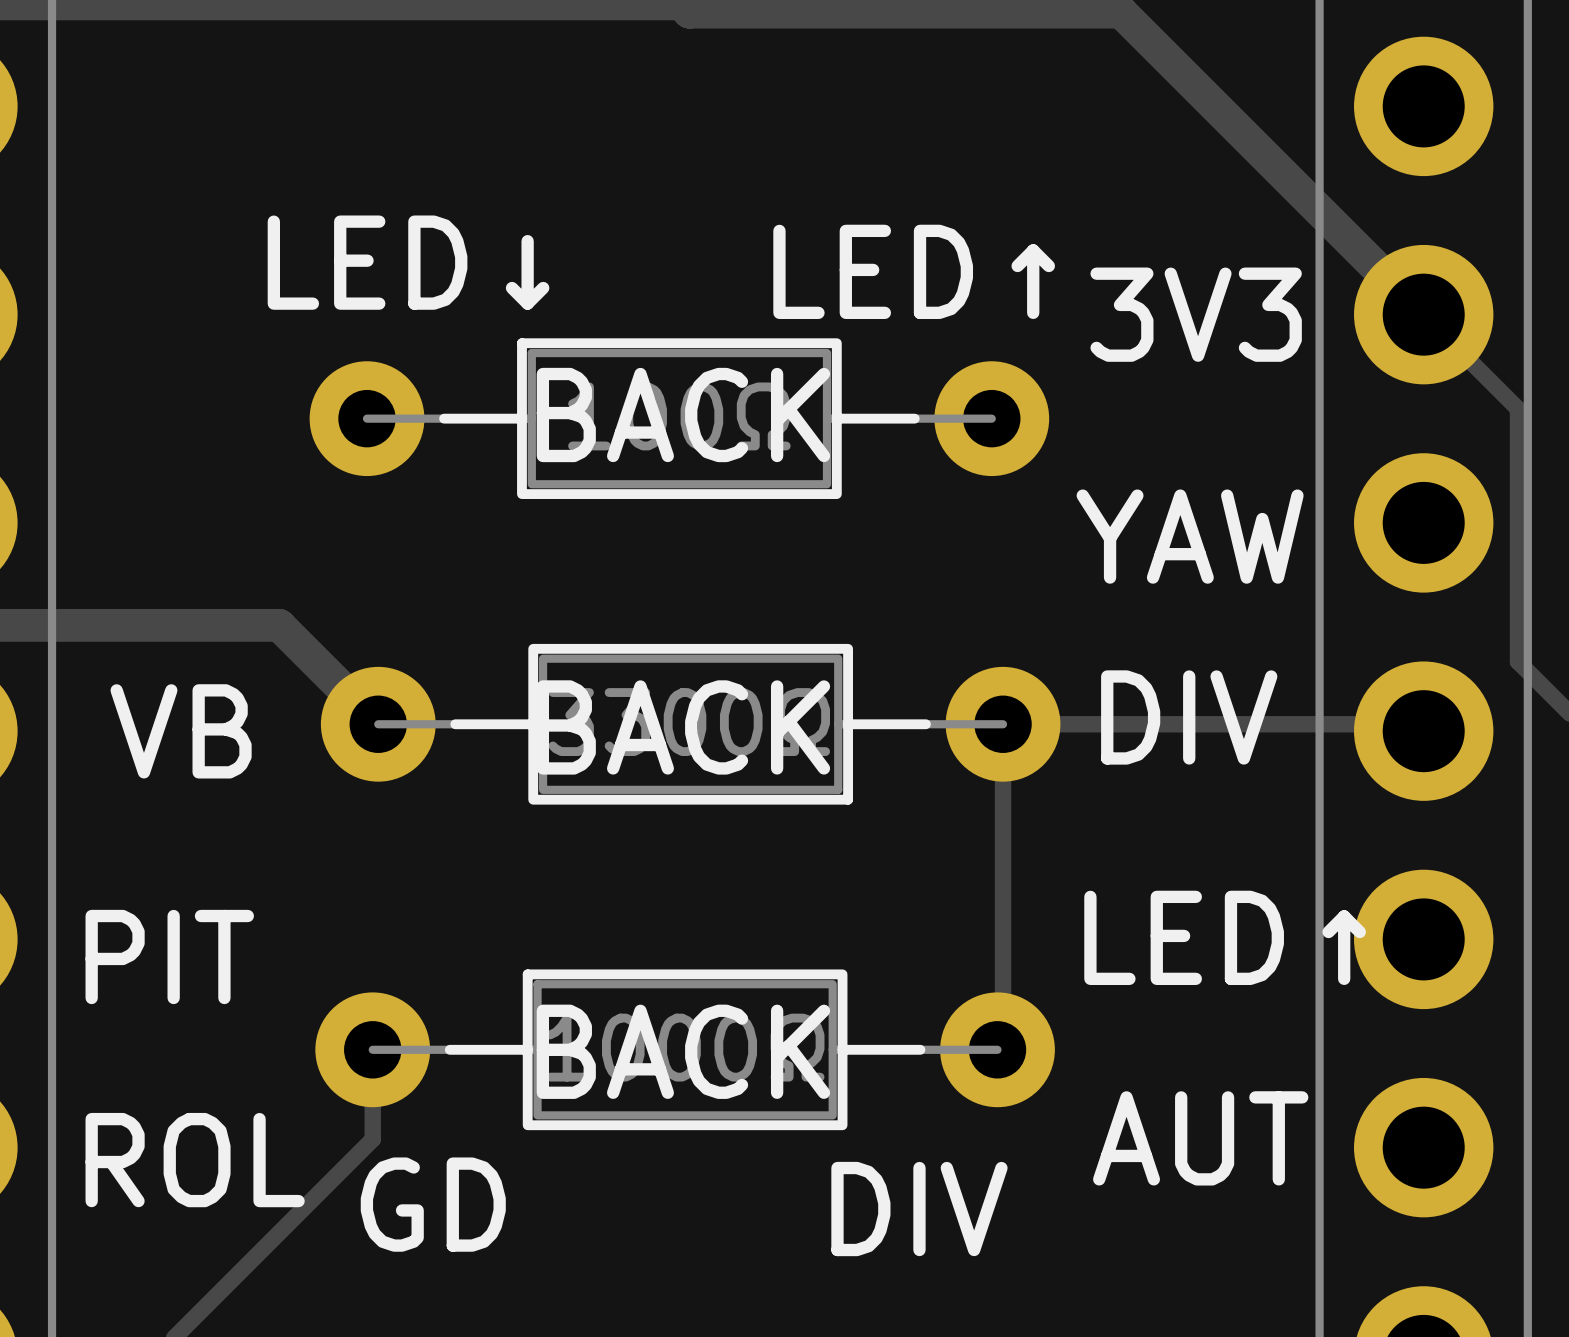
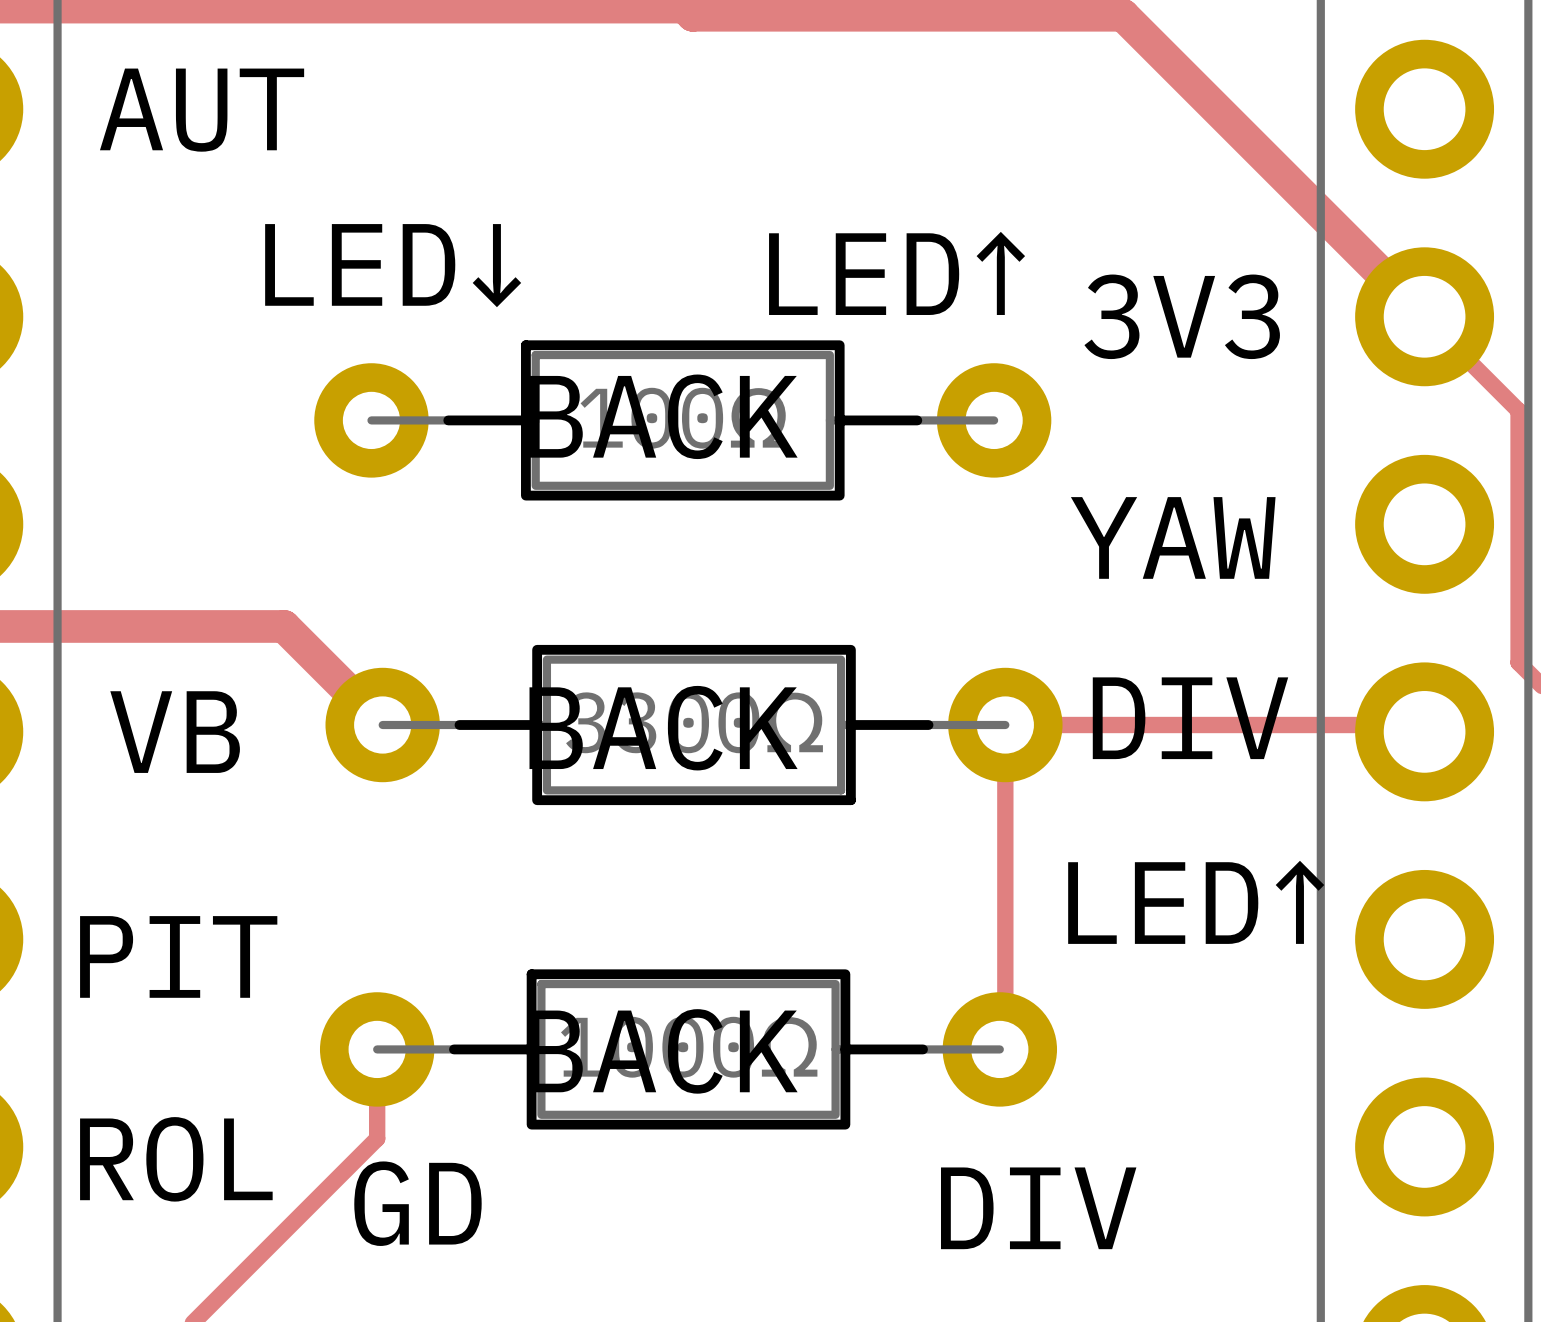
text position: LED↑ (1225, 937) -> LED↑ (1196, 902)
text position: AUT (1200, 1138) -> AUT (202, 110)
text position: DIV (919, 1209) -> DIV (1038, 1208)

